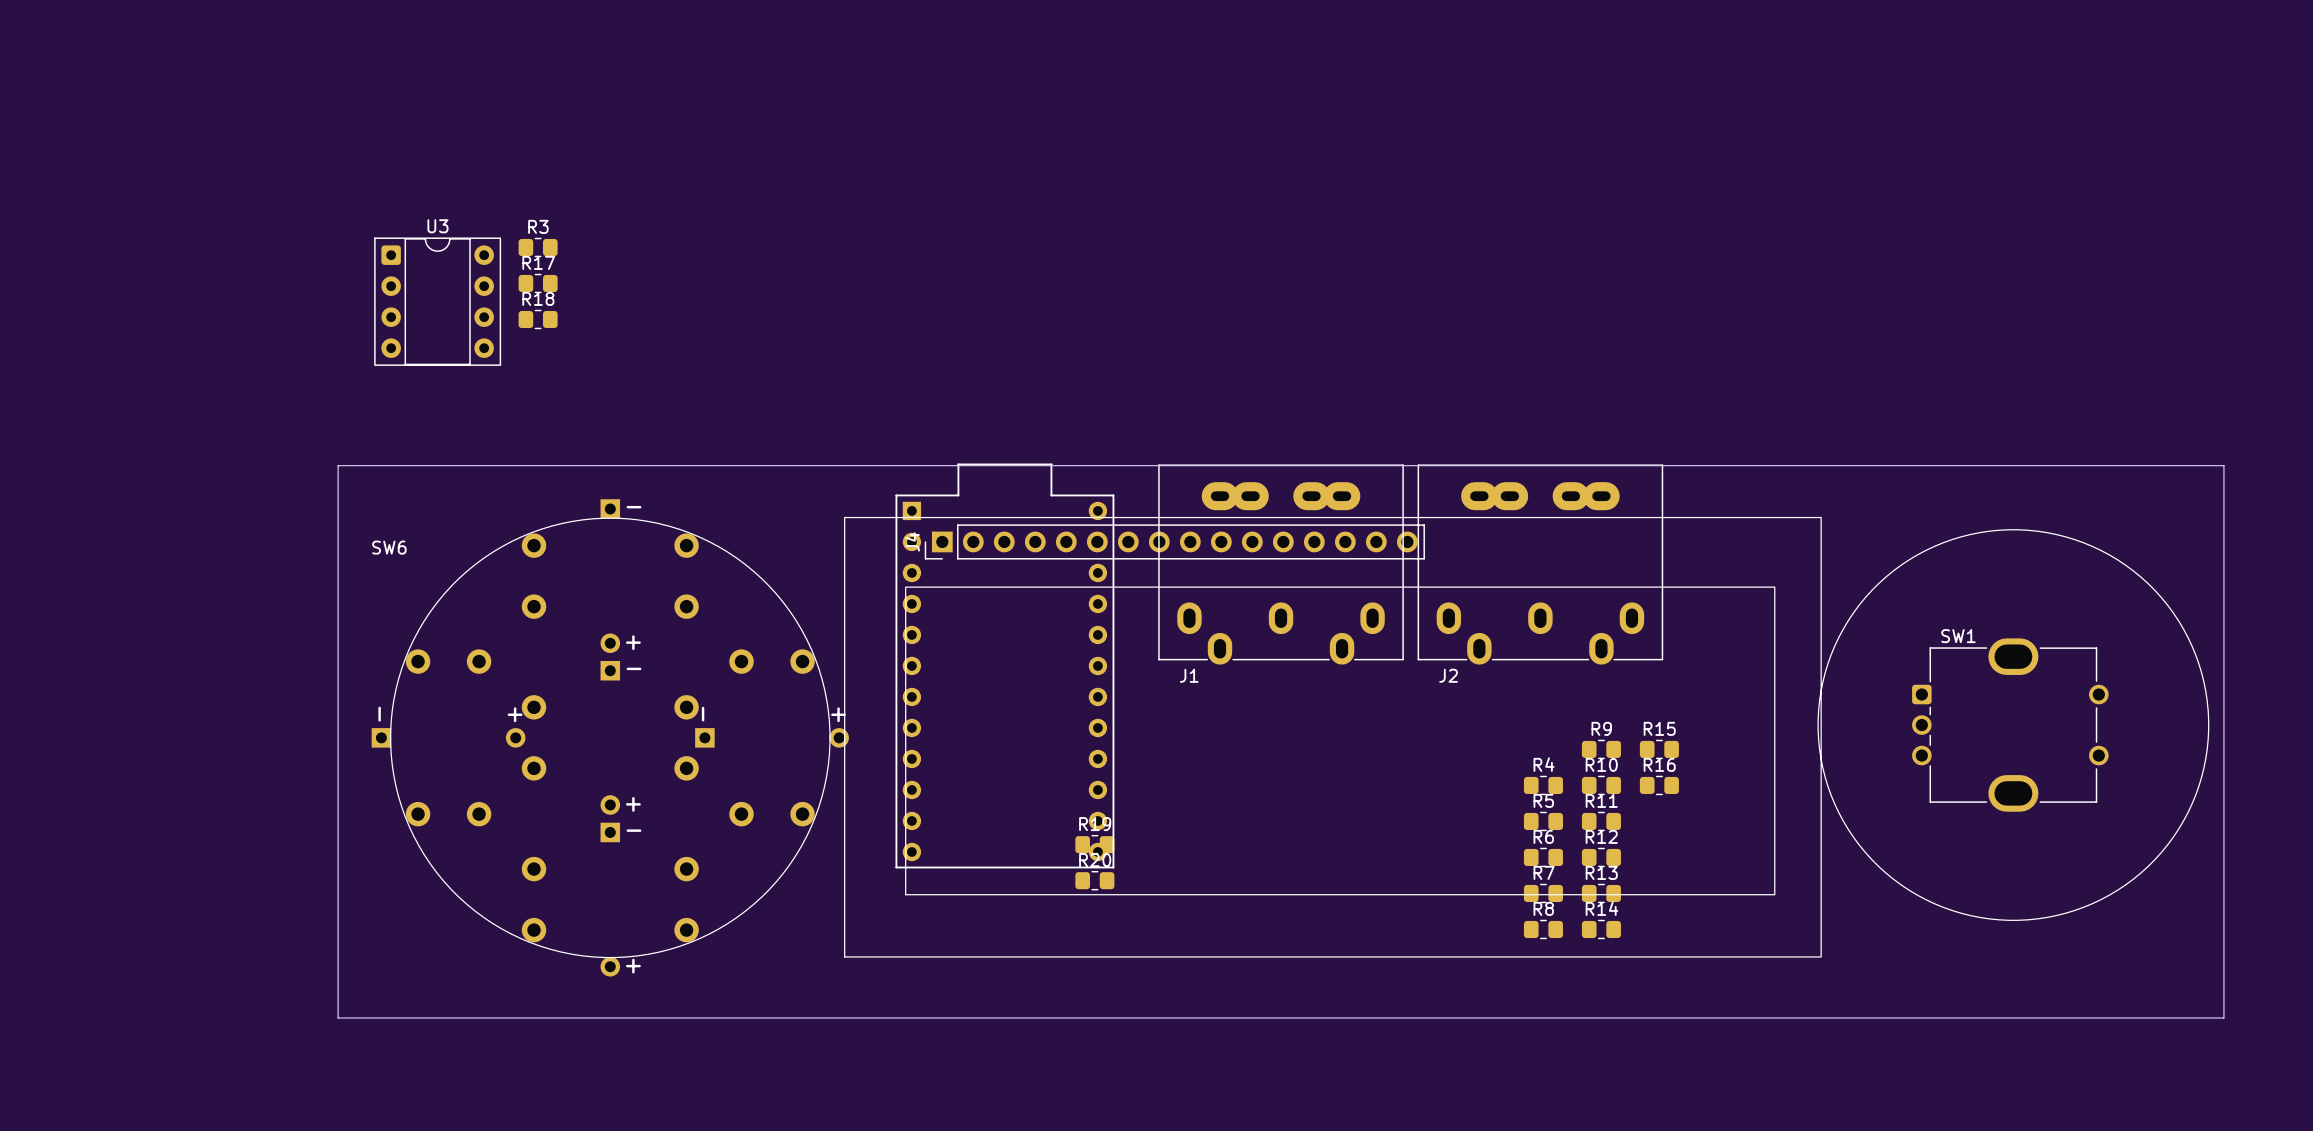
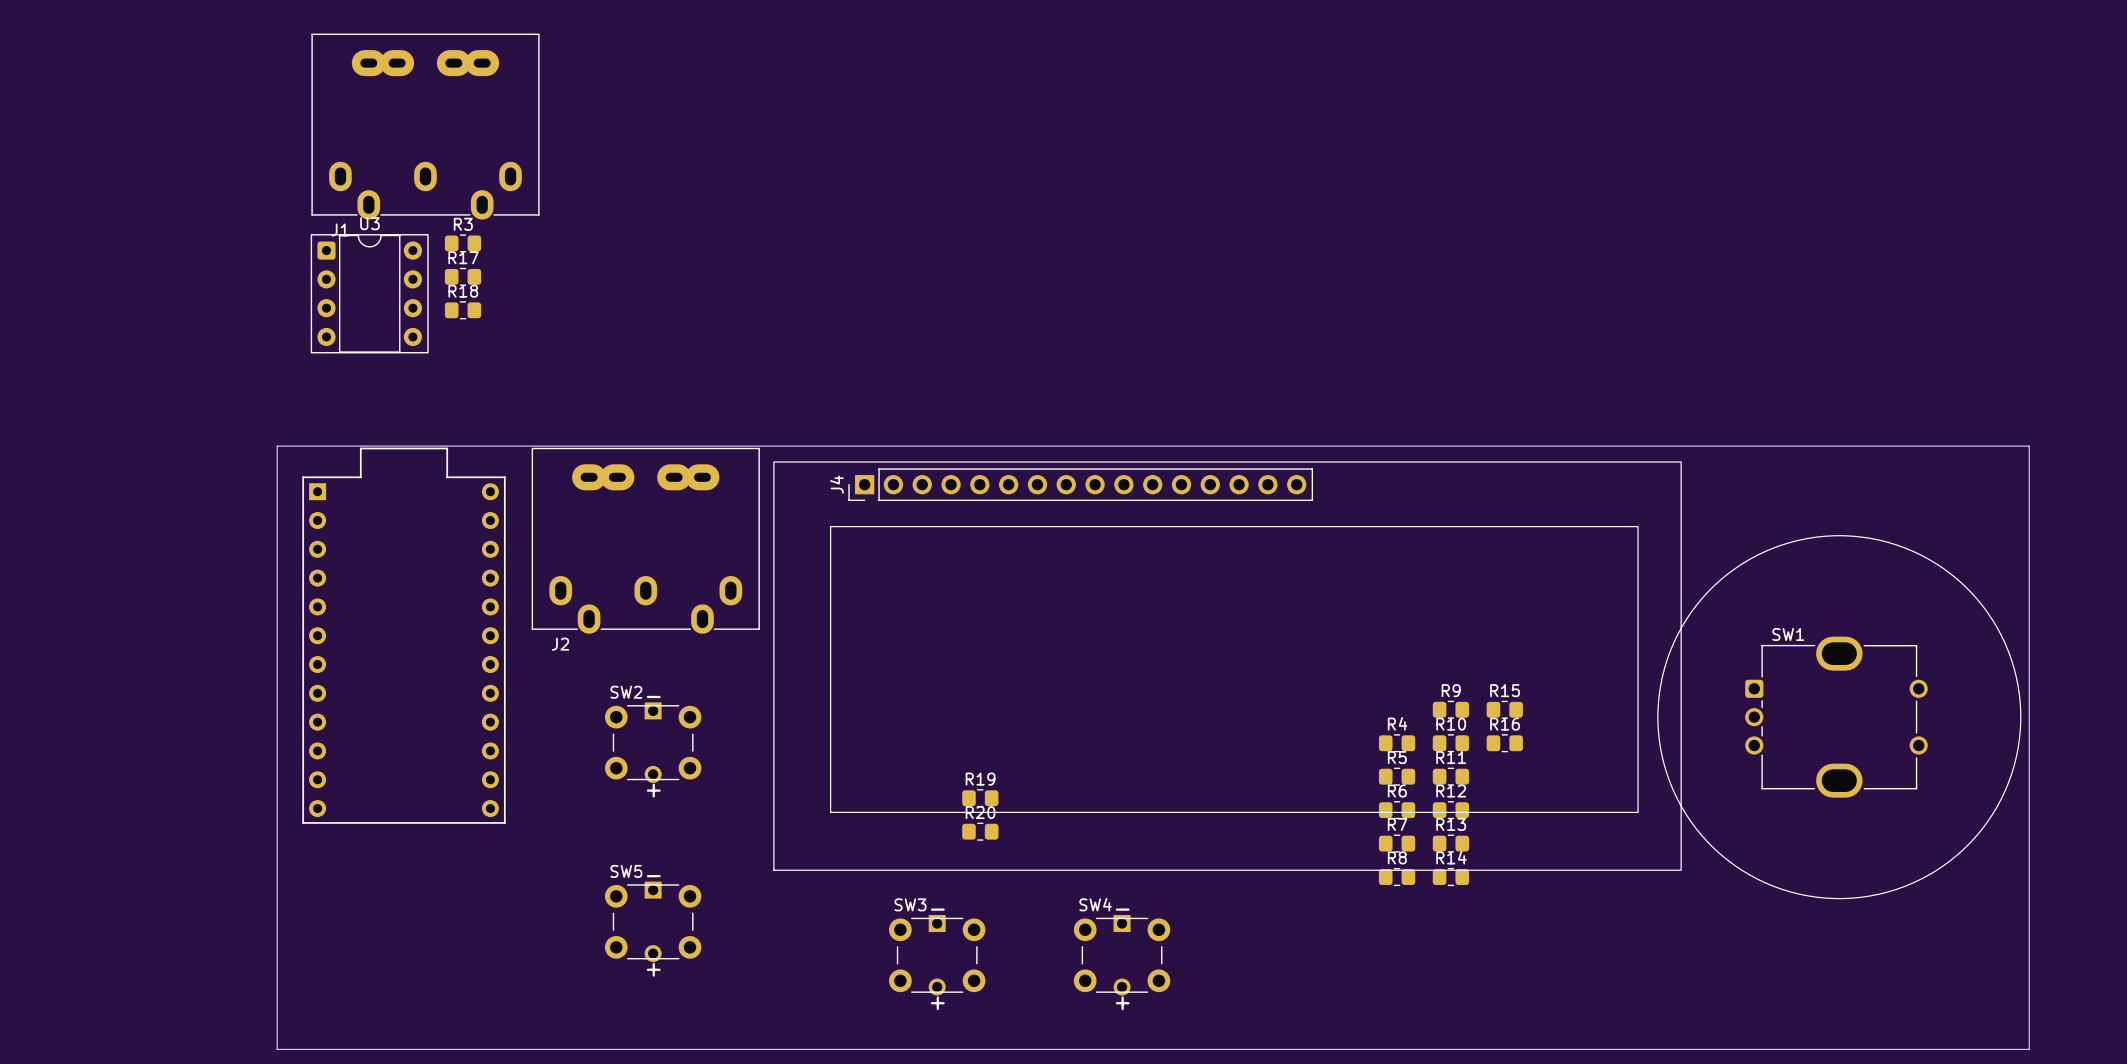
J1 position: (1281, 564) -> (425, 126)
J2 position: (1540, 564) -> (645, 540)
part: (1004, 665) -> none
part: none -> (404, 635)
SW1 position: (2013, 725) -> (1839, 717)
SW6: (610, 737) -> none
J4 position: (1332, 737) -> (1227, 666)
SW2: none -> (653, 746)
SW5: none -> (653, 925)
board edge: (338, 1017) (2223, 1017) -> (277, 959) (277, 1049) (2029, 1049) (2029, 959)
SW3: none -> (937, 959)
SW4: none -> (1122, 959)

